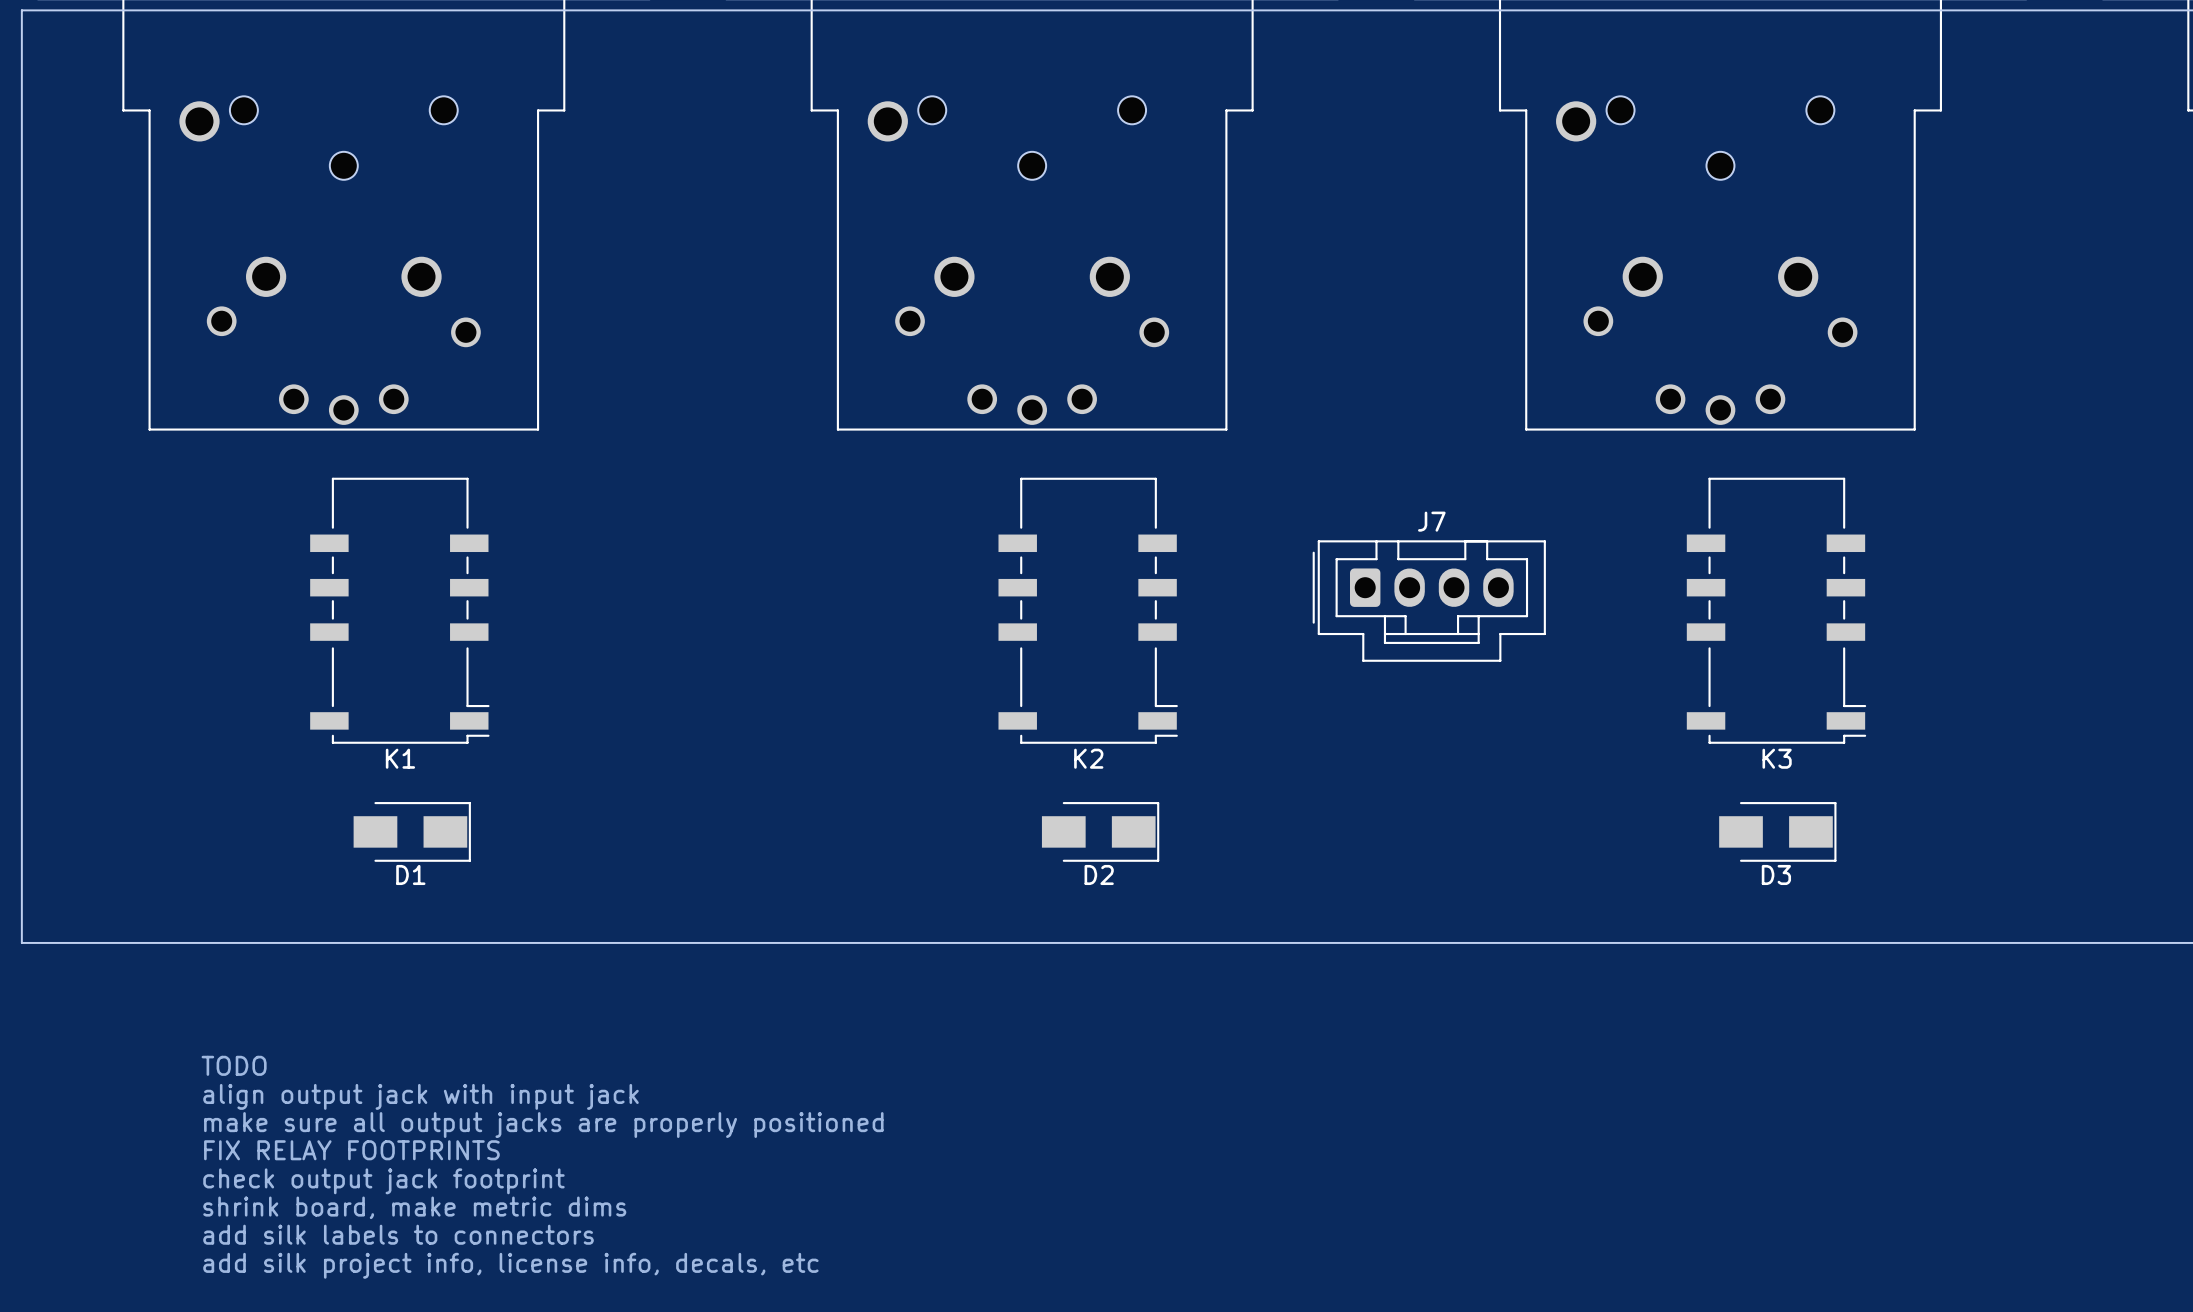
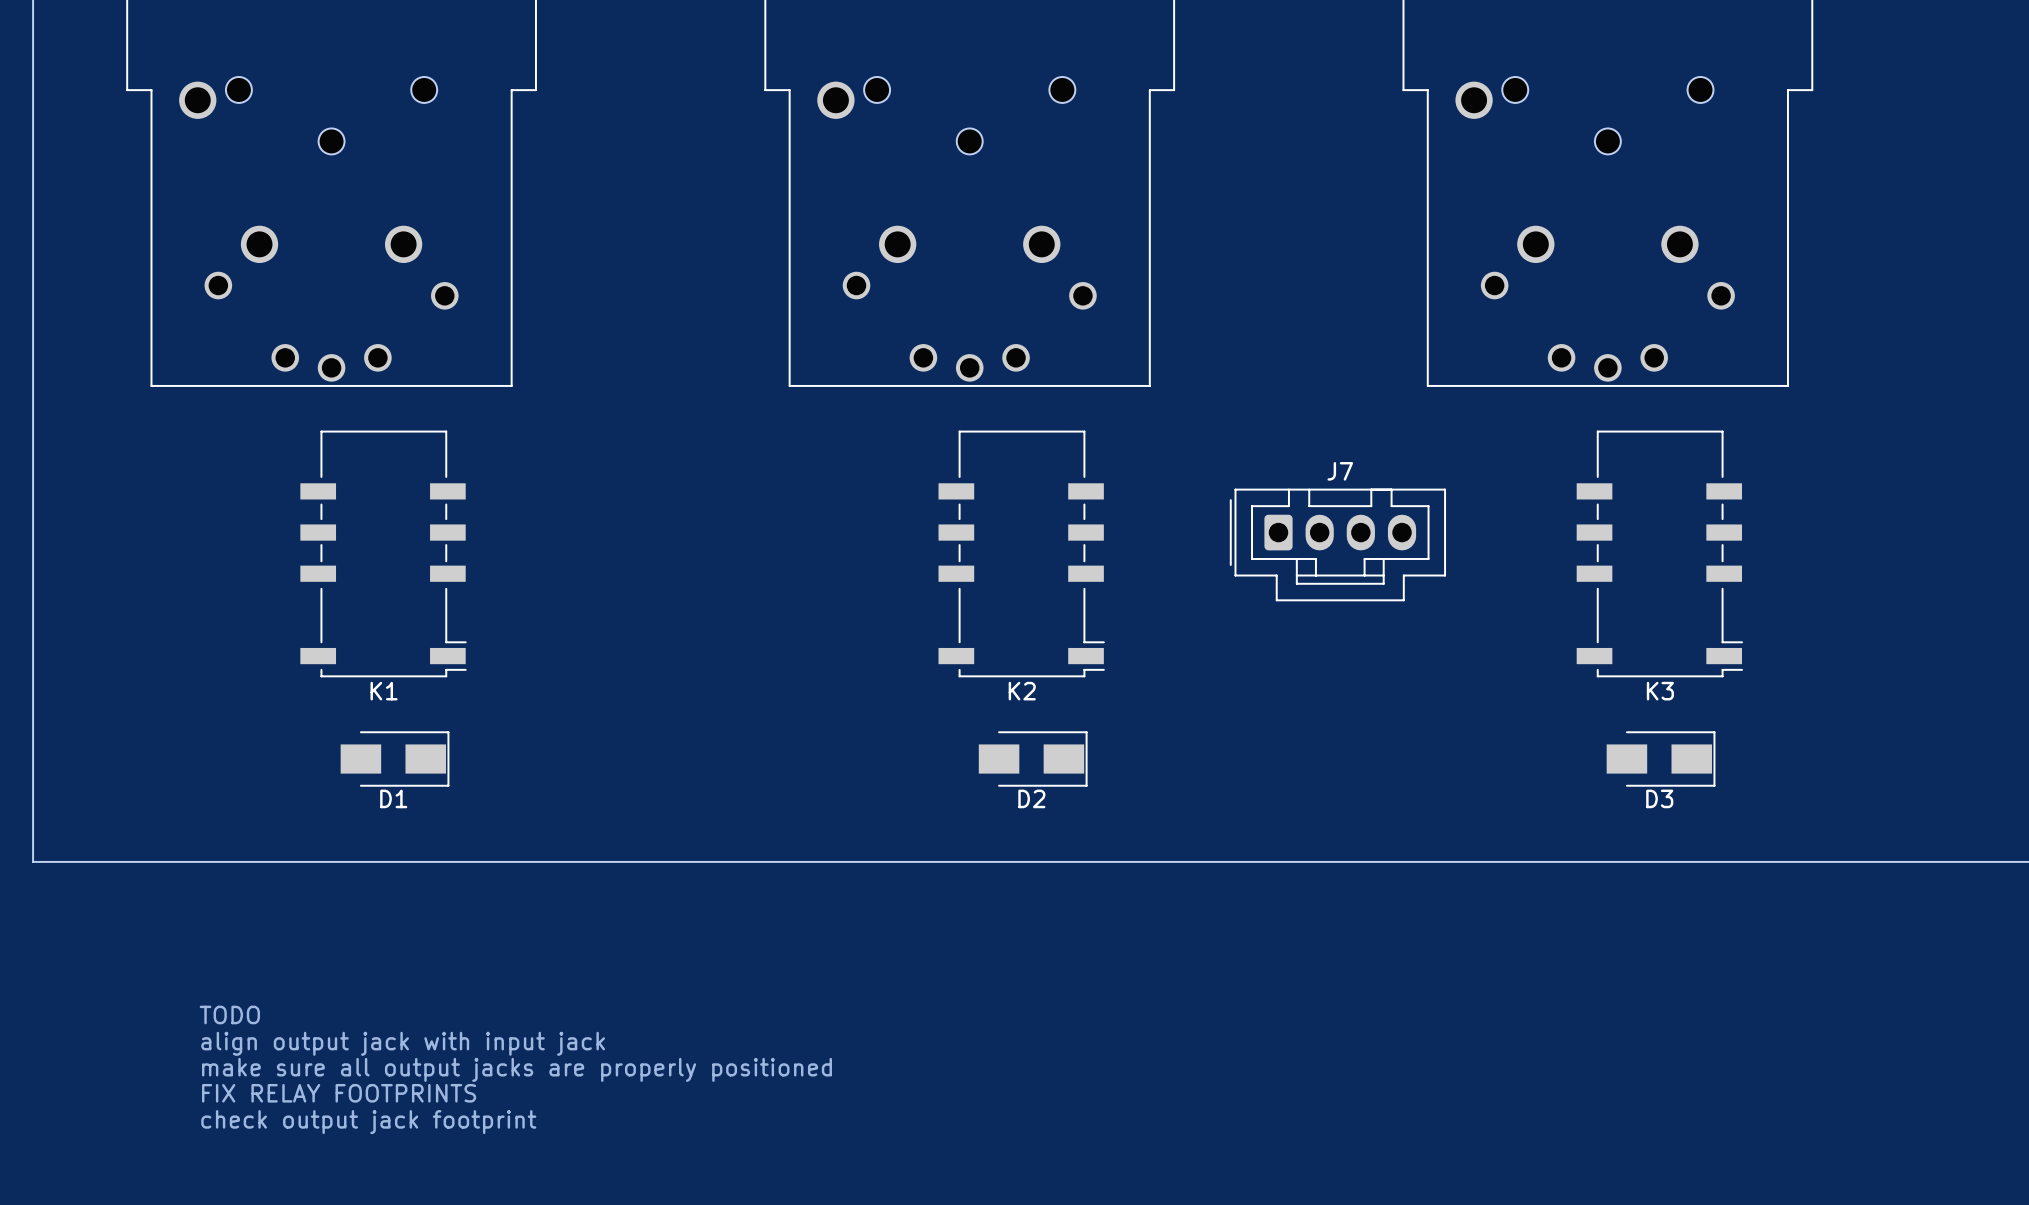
text position: TODO (234, 1065) -> TODO (229, 1014)
text position: align output jack with input jack (421, 1096) -> align output jack with input jack (403, 1043)
text position: make sure all output jacks are properly positioned (543, 1125) -> make sure all output jacks are properly positioned (516, 1069)
text position: FIX RELAY FOOTPRINTS (351, 1150) -> FIX RELAY FOOTPRINTS (339, 1093)
text position: check output jack footprint (383, 1181) -> check output jack footprint (368, 1122)
text: shrink board, make metric dims (414, 1207) -> none
text: add silk labels to connectors (398, 1234) -> none
text: add silk project info, license info, decals, etc (510, 1265) -> none

